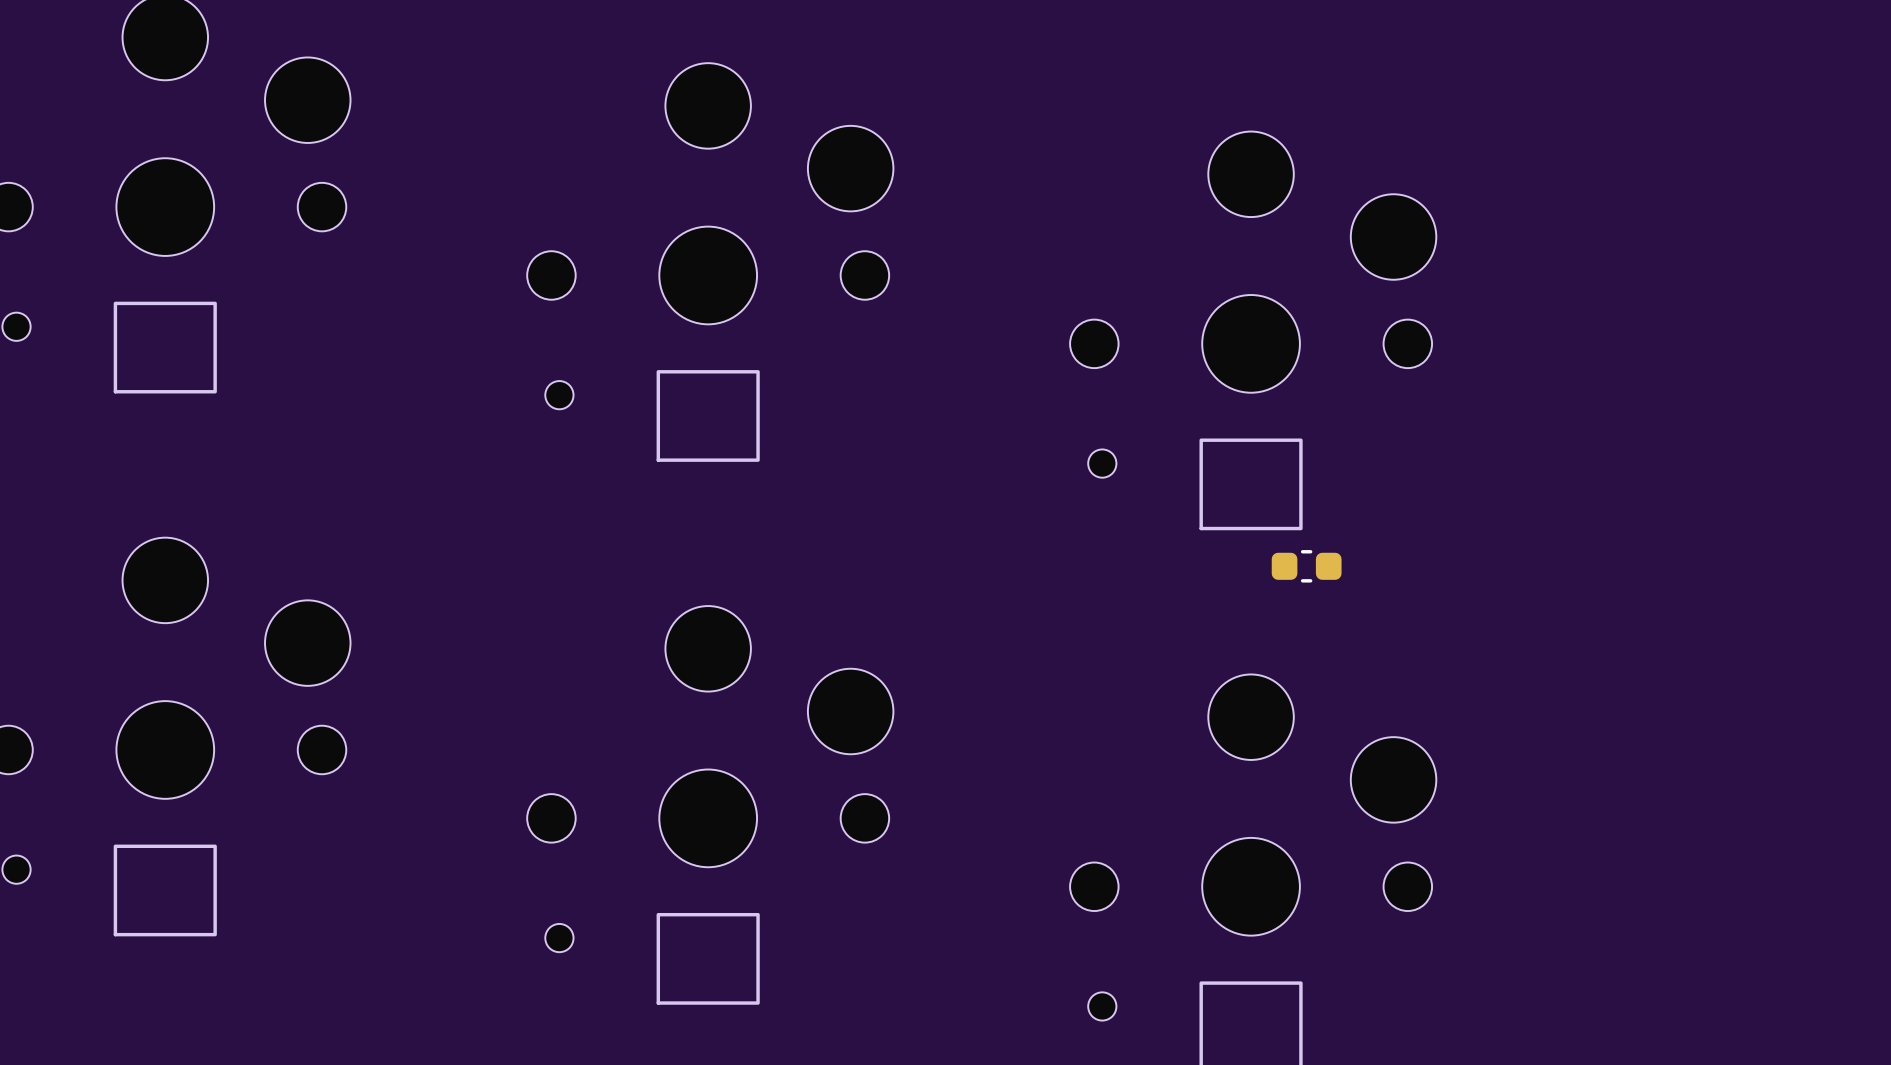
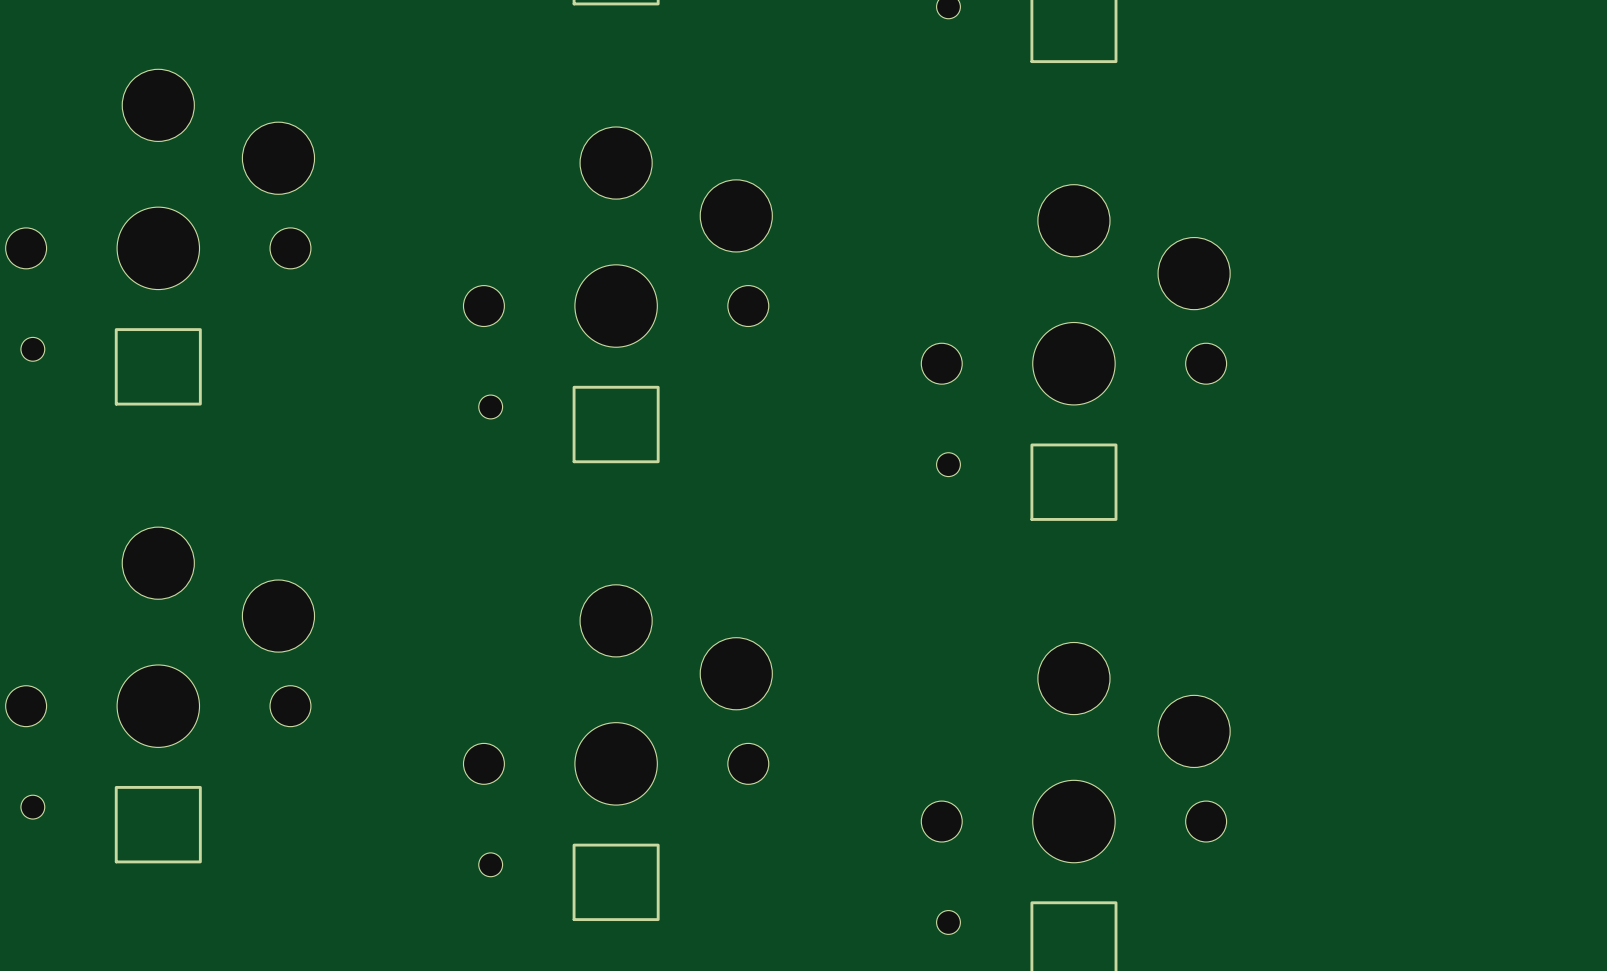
part: (1306, 566) -> none

